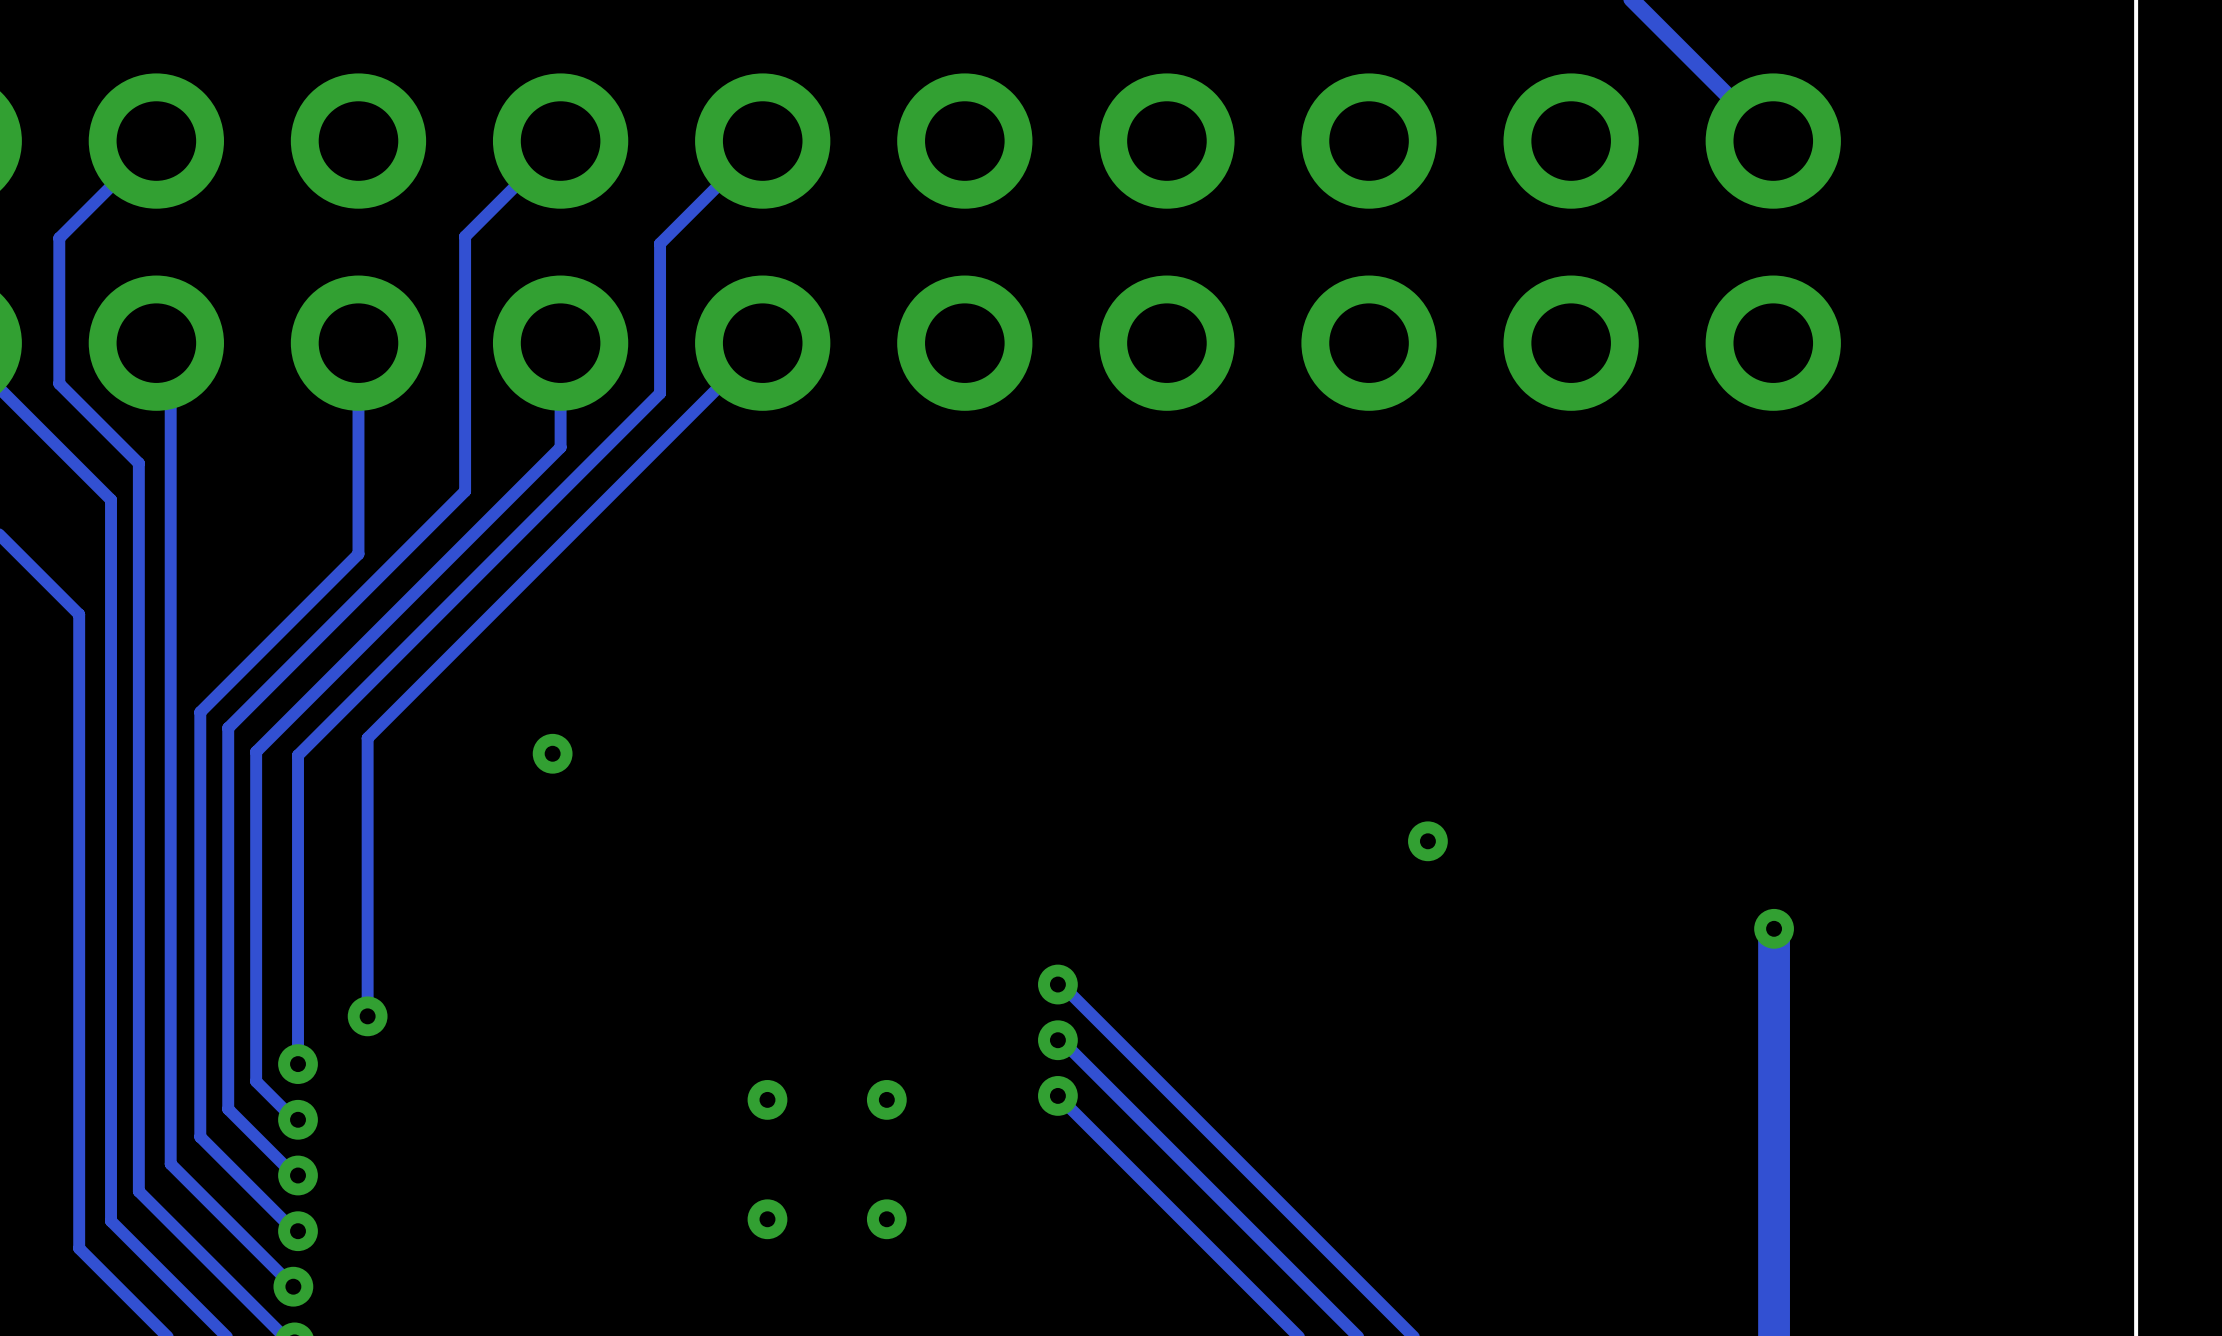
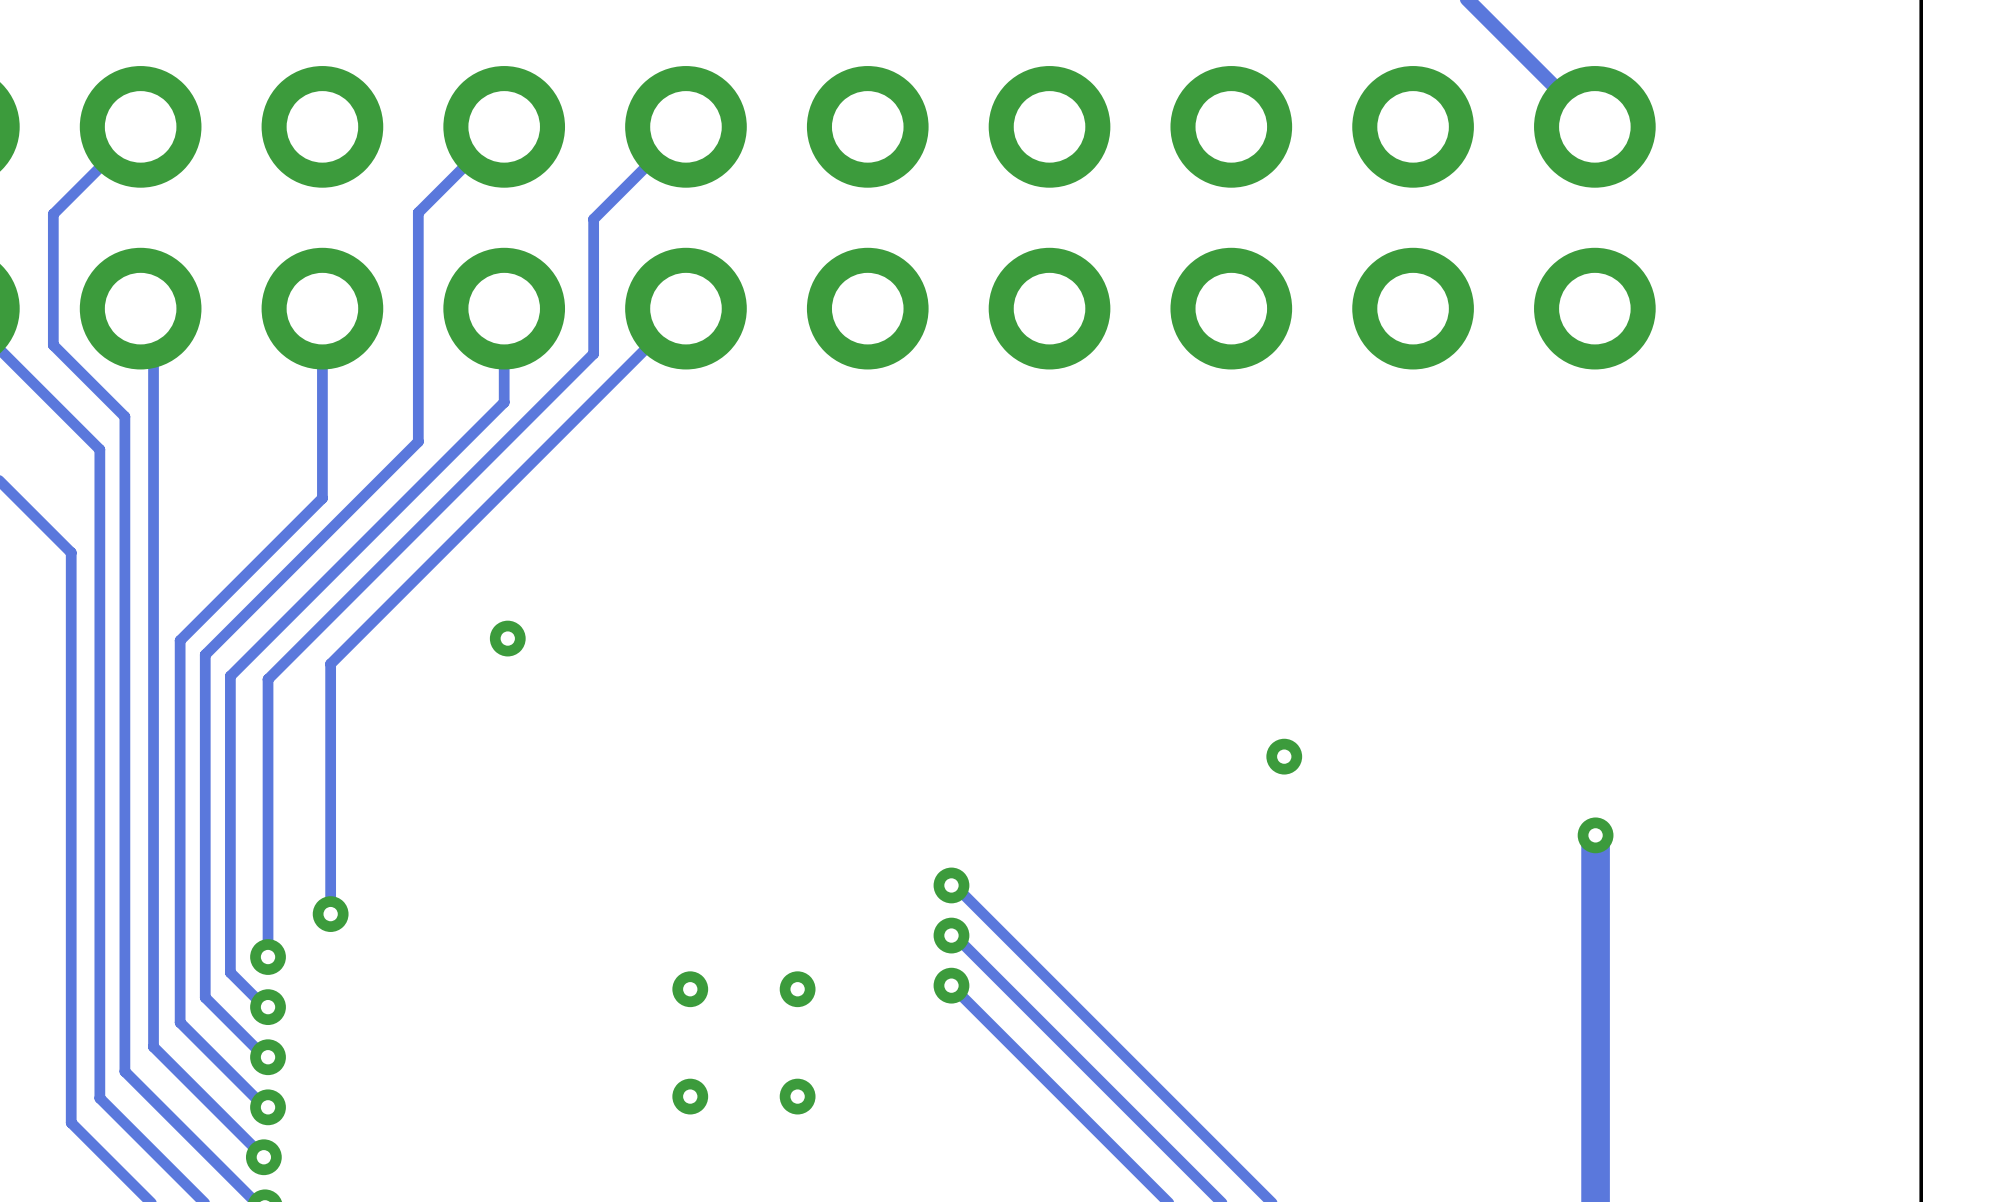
via position: (552, 753) -> (507, 638)

